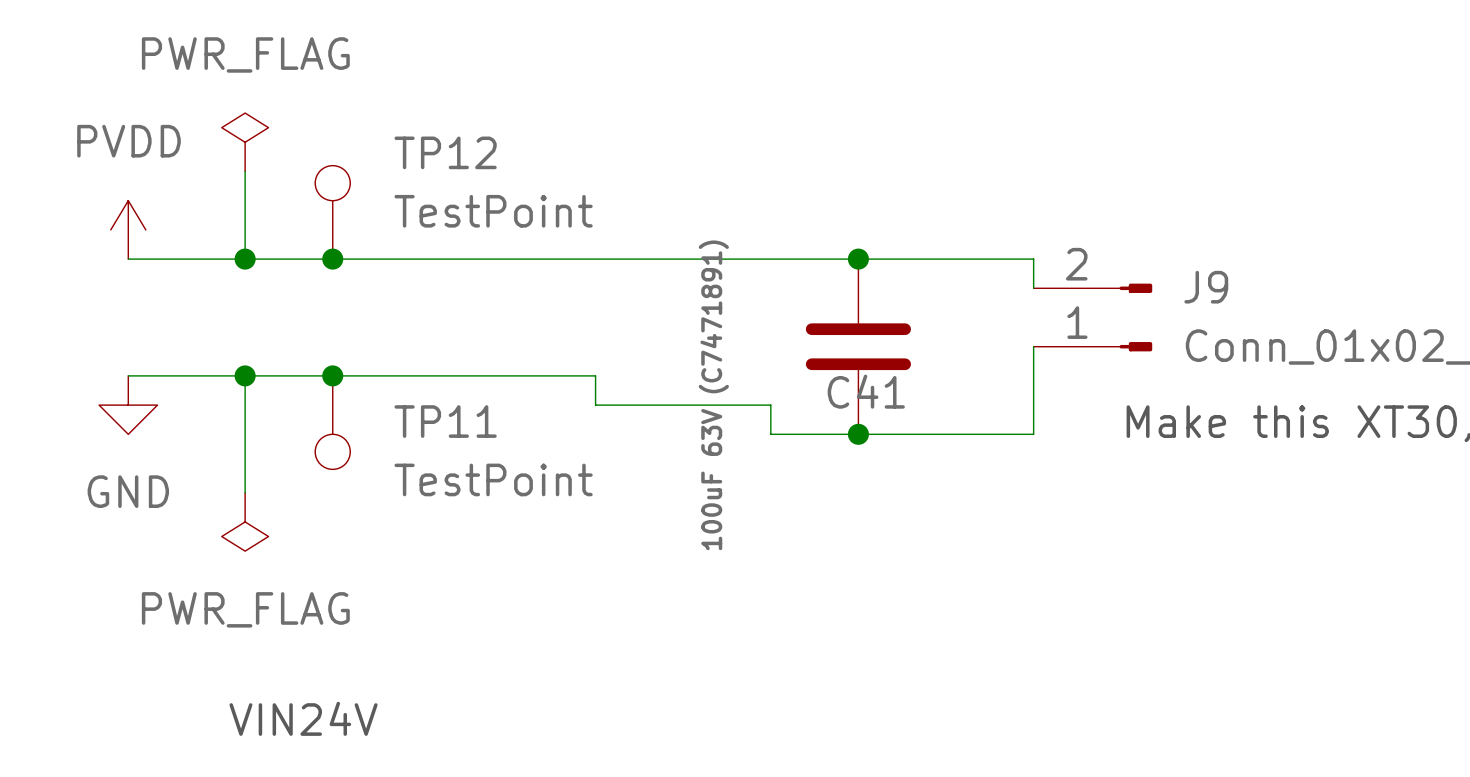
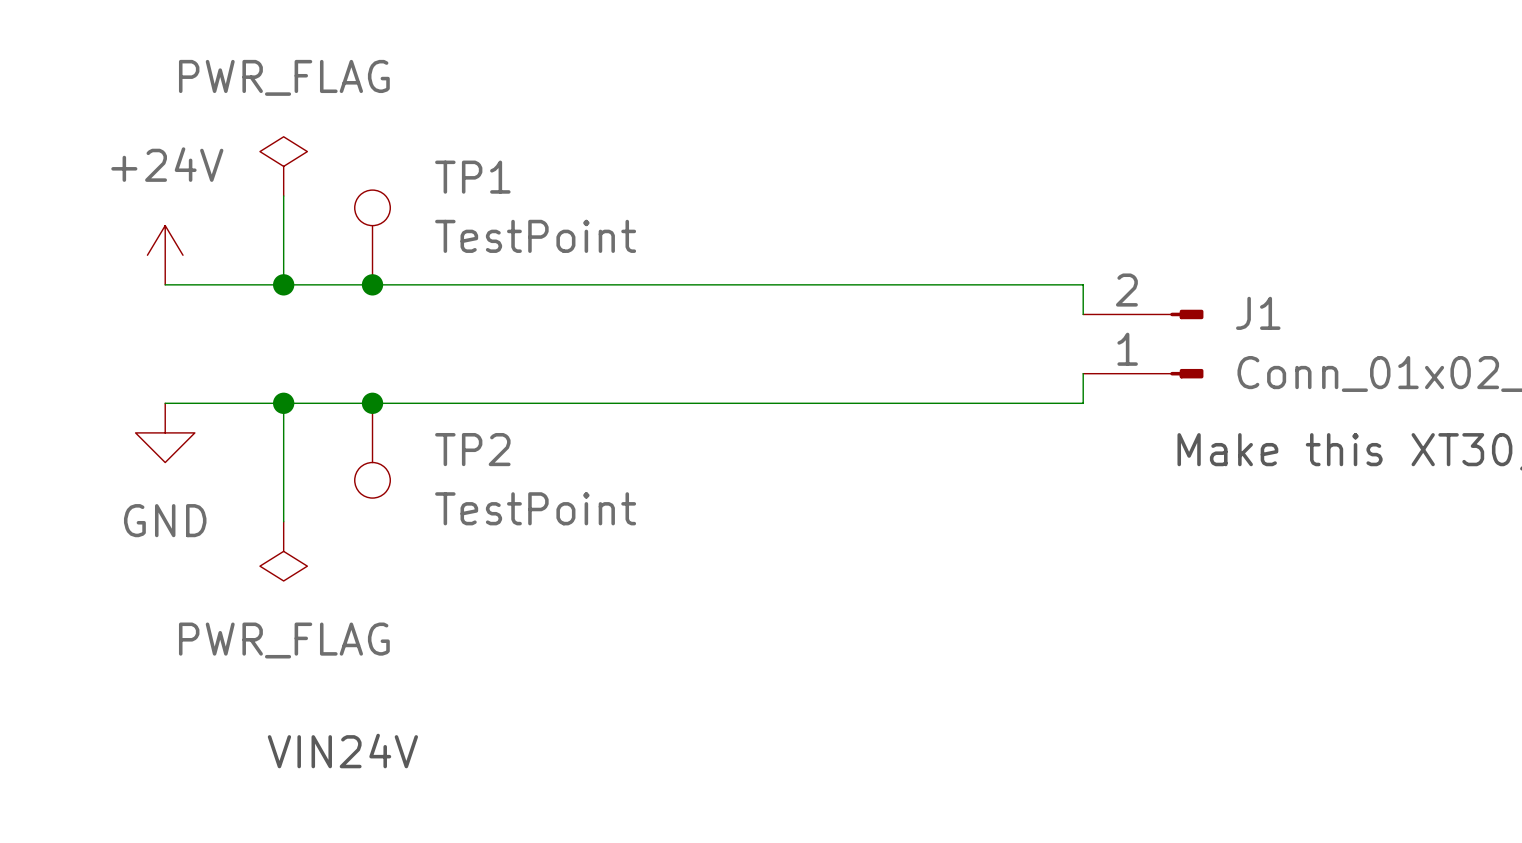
TP12 name: TP12 (445, 152) -> TP1 (472, 177)
power symbol: PVDD (128, 229) -> +24V (165, 255)
junction: (858, 259) -> none
J9 name: J9 (1206, 287) -> J1 (1258, 313)
C41: 100uF 63V (C7471891) (858, 346) -> none
wire: (595, 375) (595, 405) (770, 405) (770, 434) (1033, 434) (1033, 375) -> (639, 403) (1083, 403)
TP11 name: TP11 (445, 421) -> TP2 (472, 449)
junction: (858, 434) -> none

